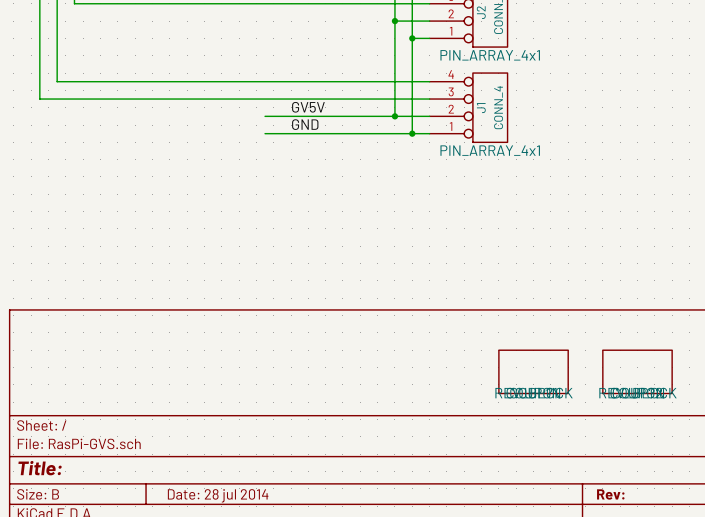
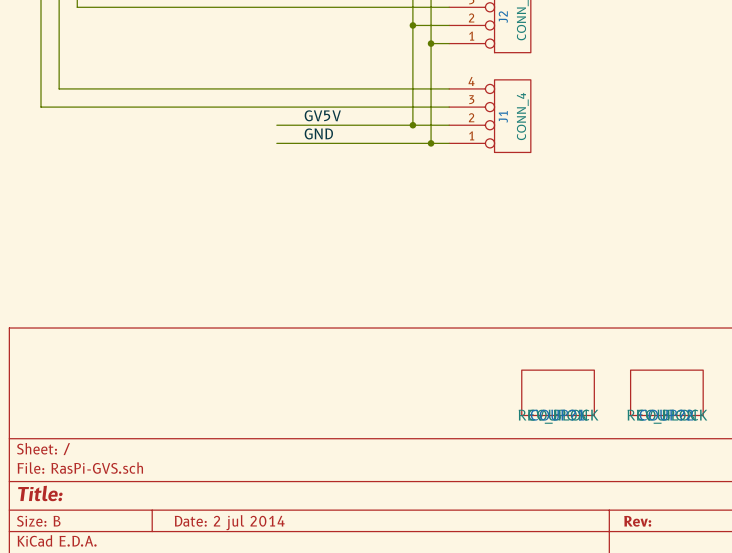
J2 text: PIN_ARRAY_4x1 (490, 55) -> none
J1 text: PIN_ARRAY_4x1 (490, 150) -> none
title block: Date: 28 jul 2014 (218, 495) -> Date: 2 jul 2014 (229, 522)

